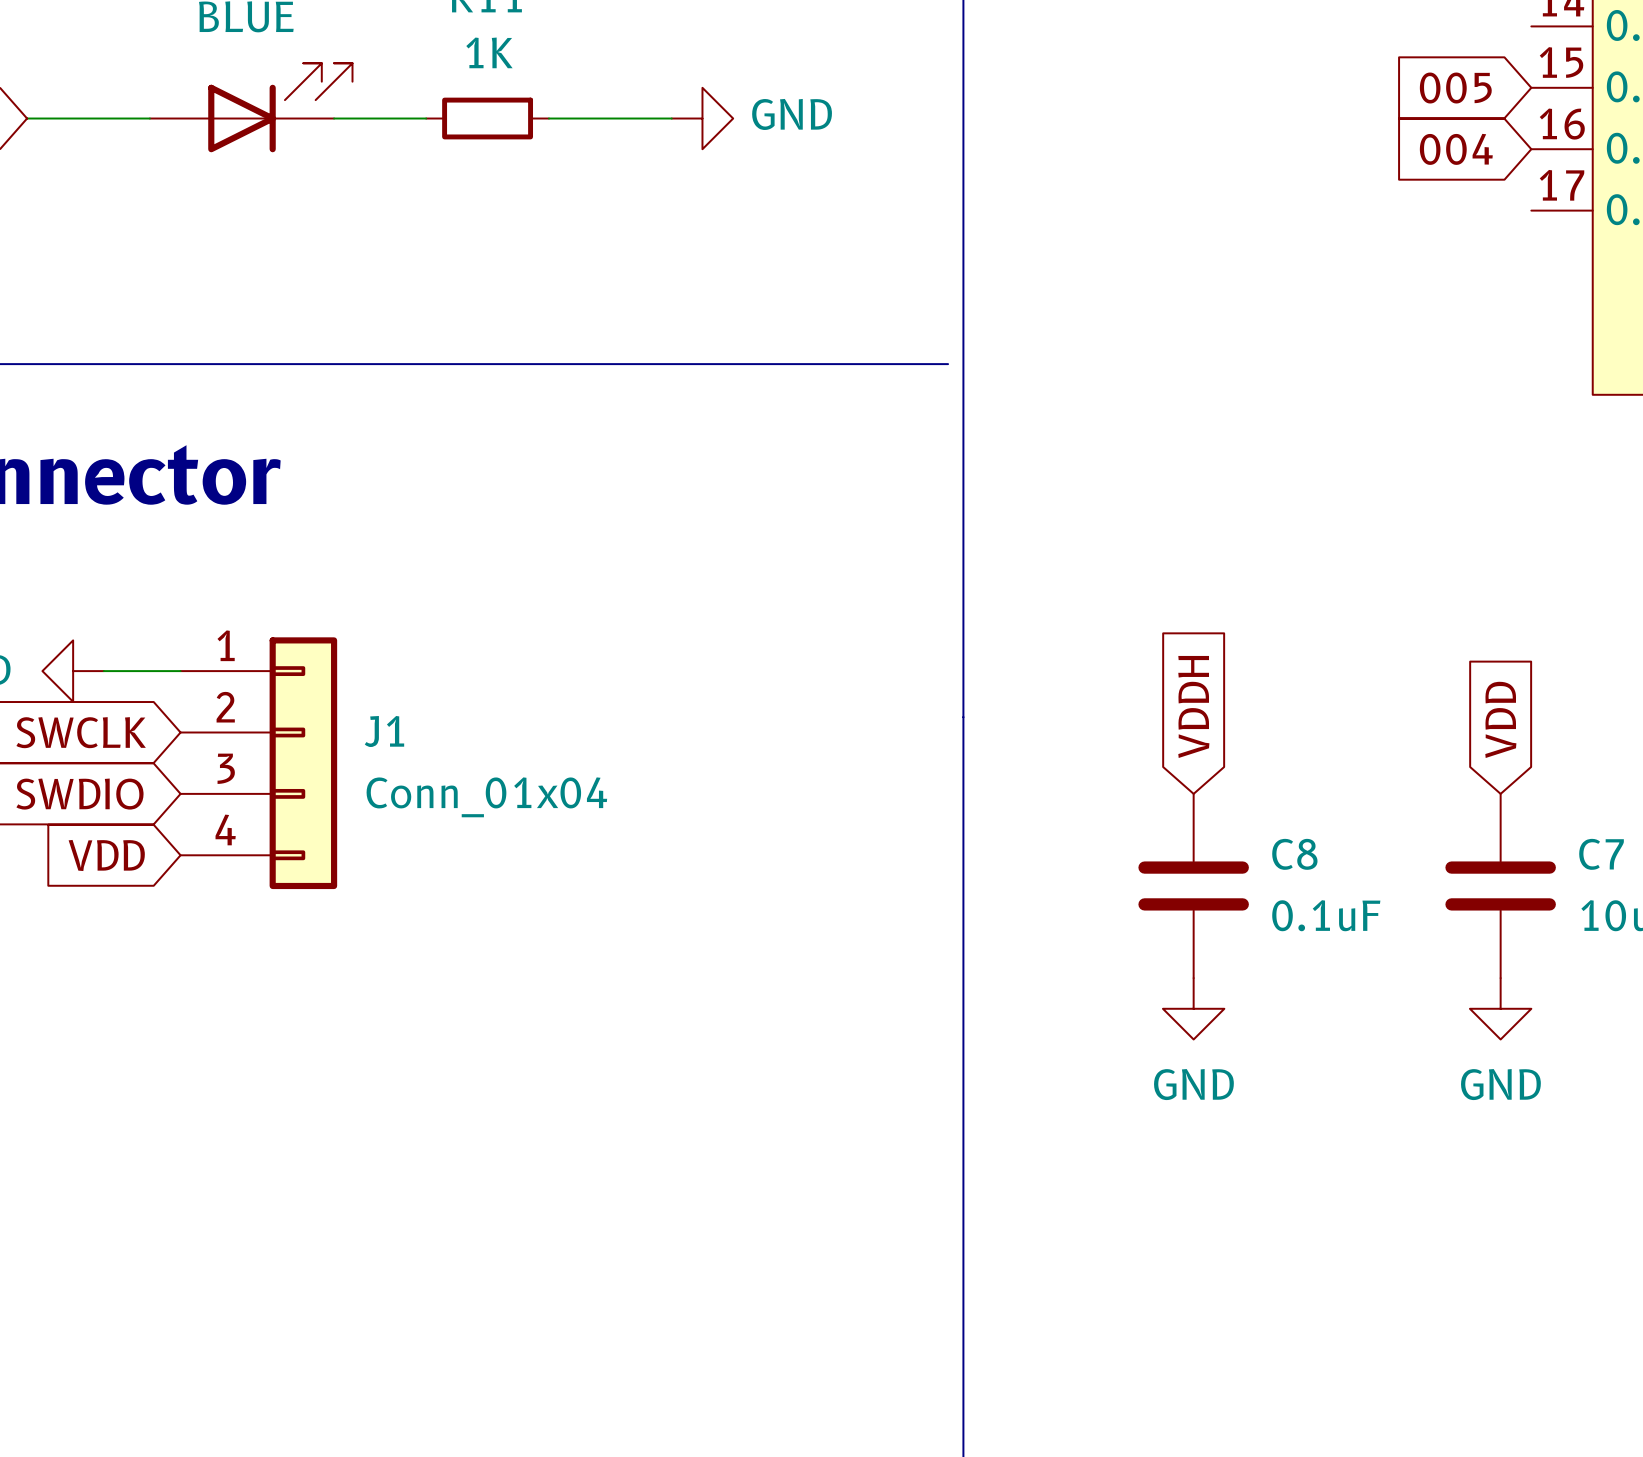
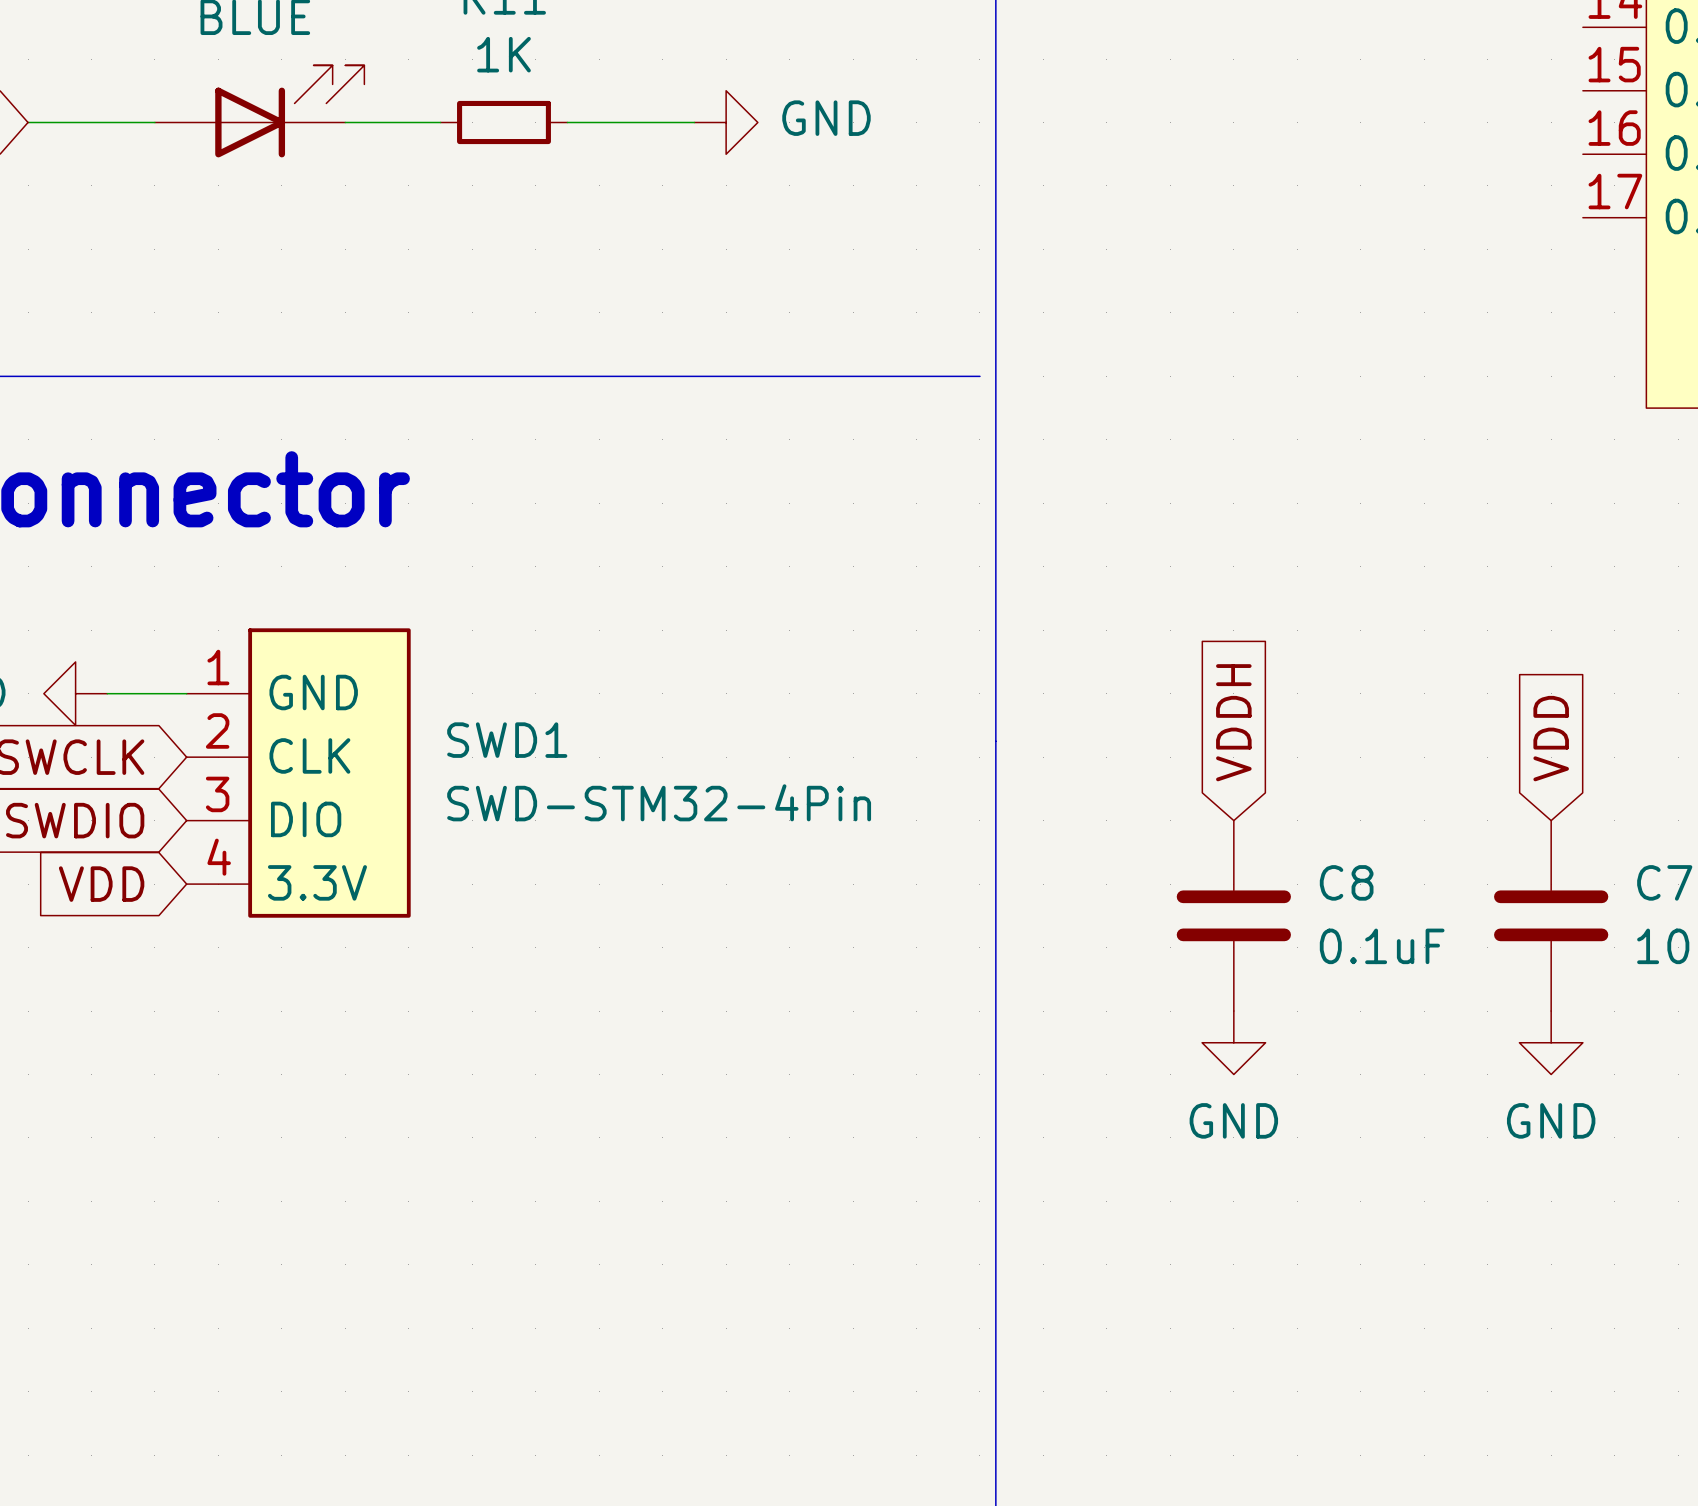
global label: 005 (1455, 88) -> none
global label: 004 (1456, 149) -> none
SWD1: none -> SWD-STM32-4Pin (298, 773)
J1: Conn_01x04 (258, 763) -> none

